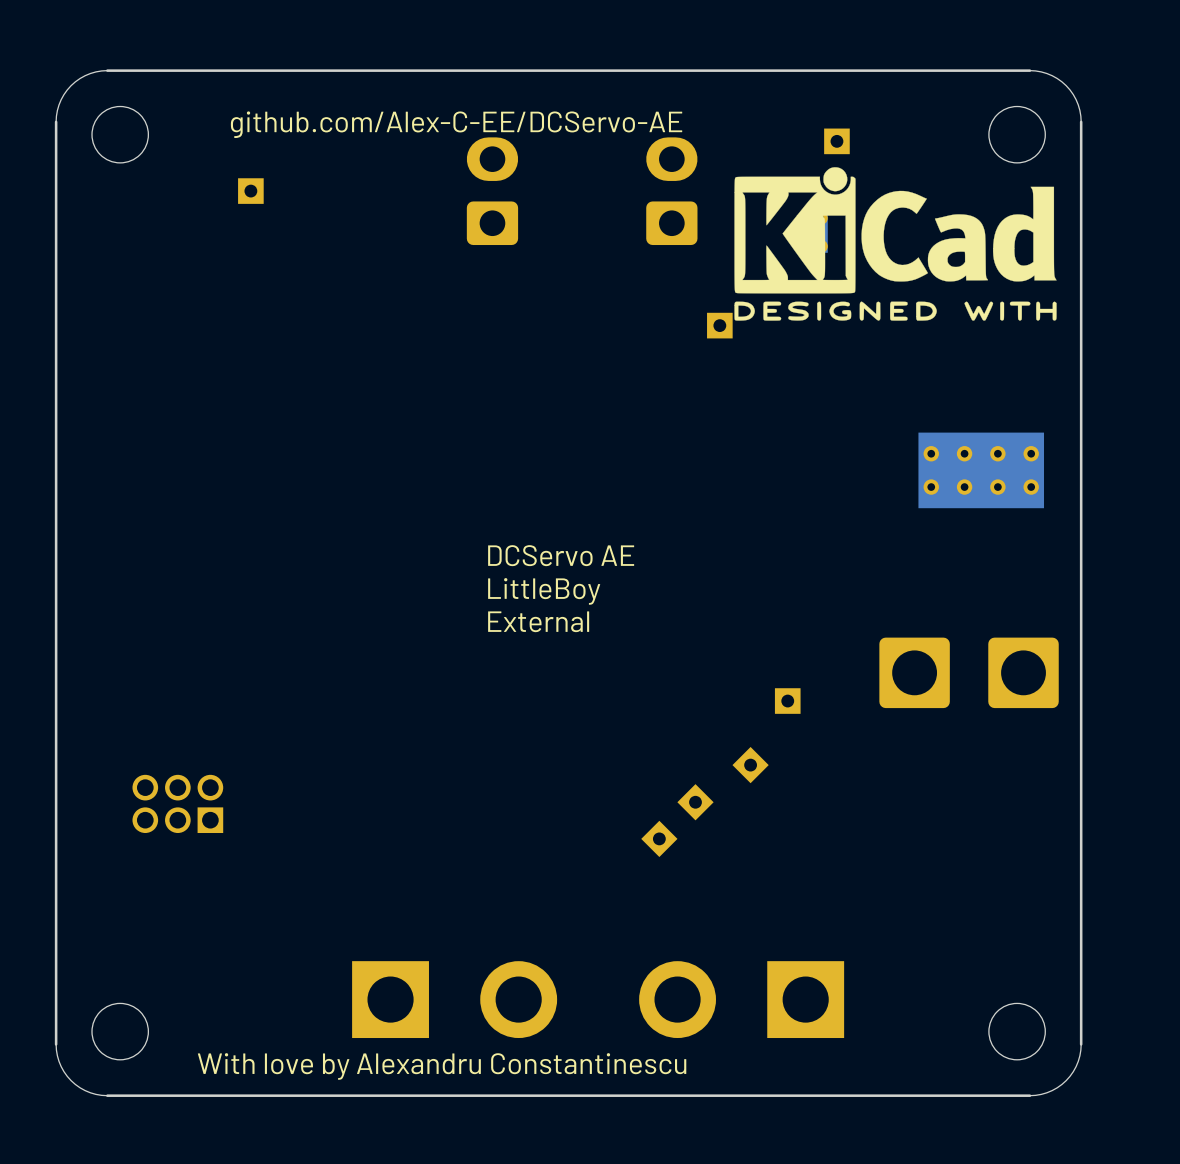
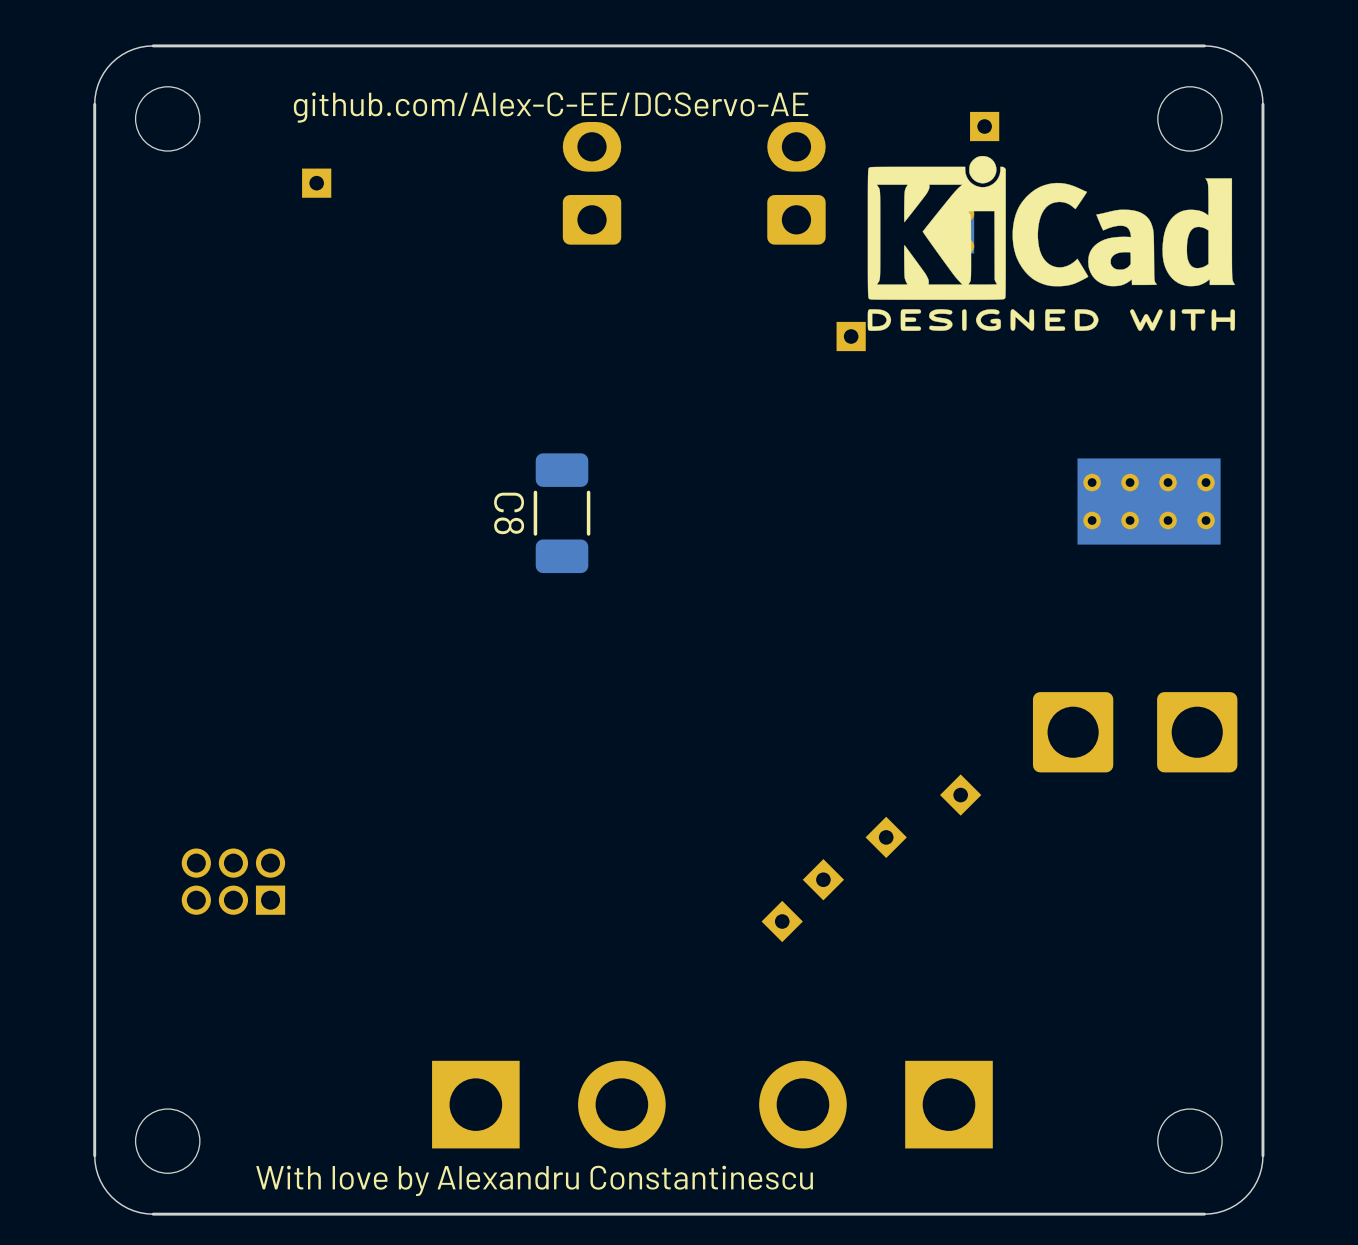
C8: none -> (562, 513)
text: DCServo AE (561, 555) -> none
text: LittleBoy (544, 591) -> none
text: External (538, 621) -> none
part: (787, 701) -> none
part: none -> (960, 795)

